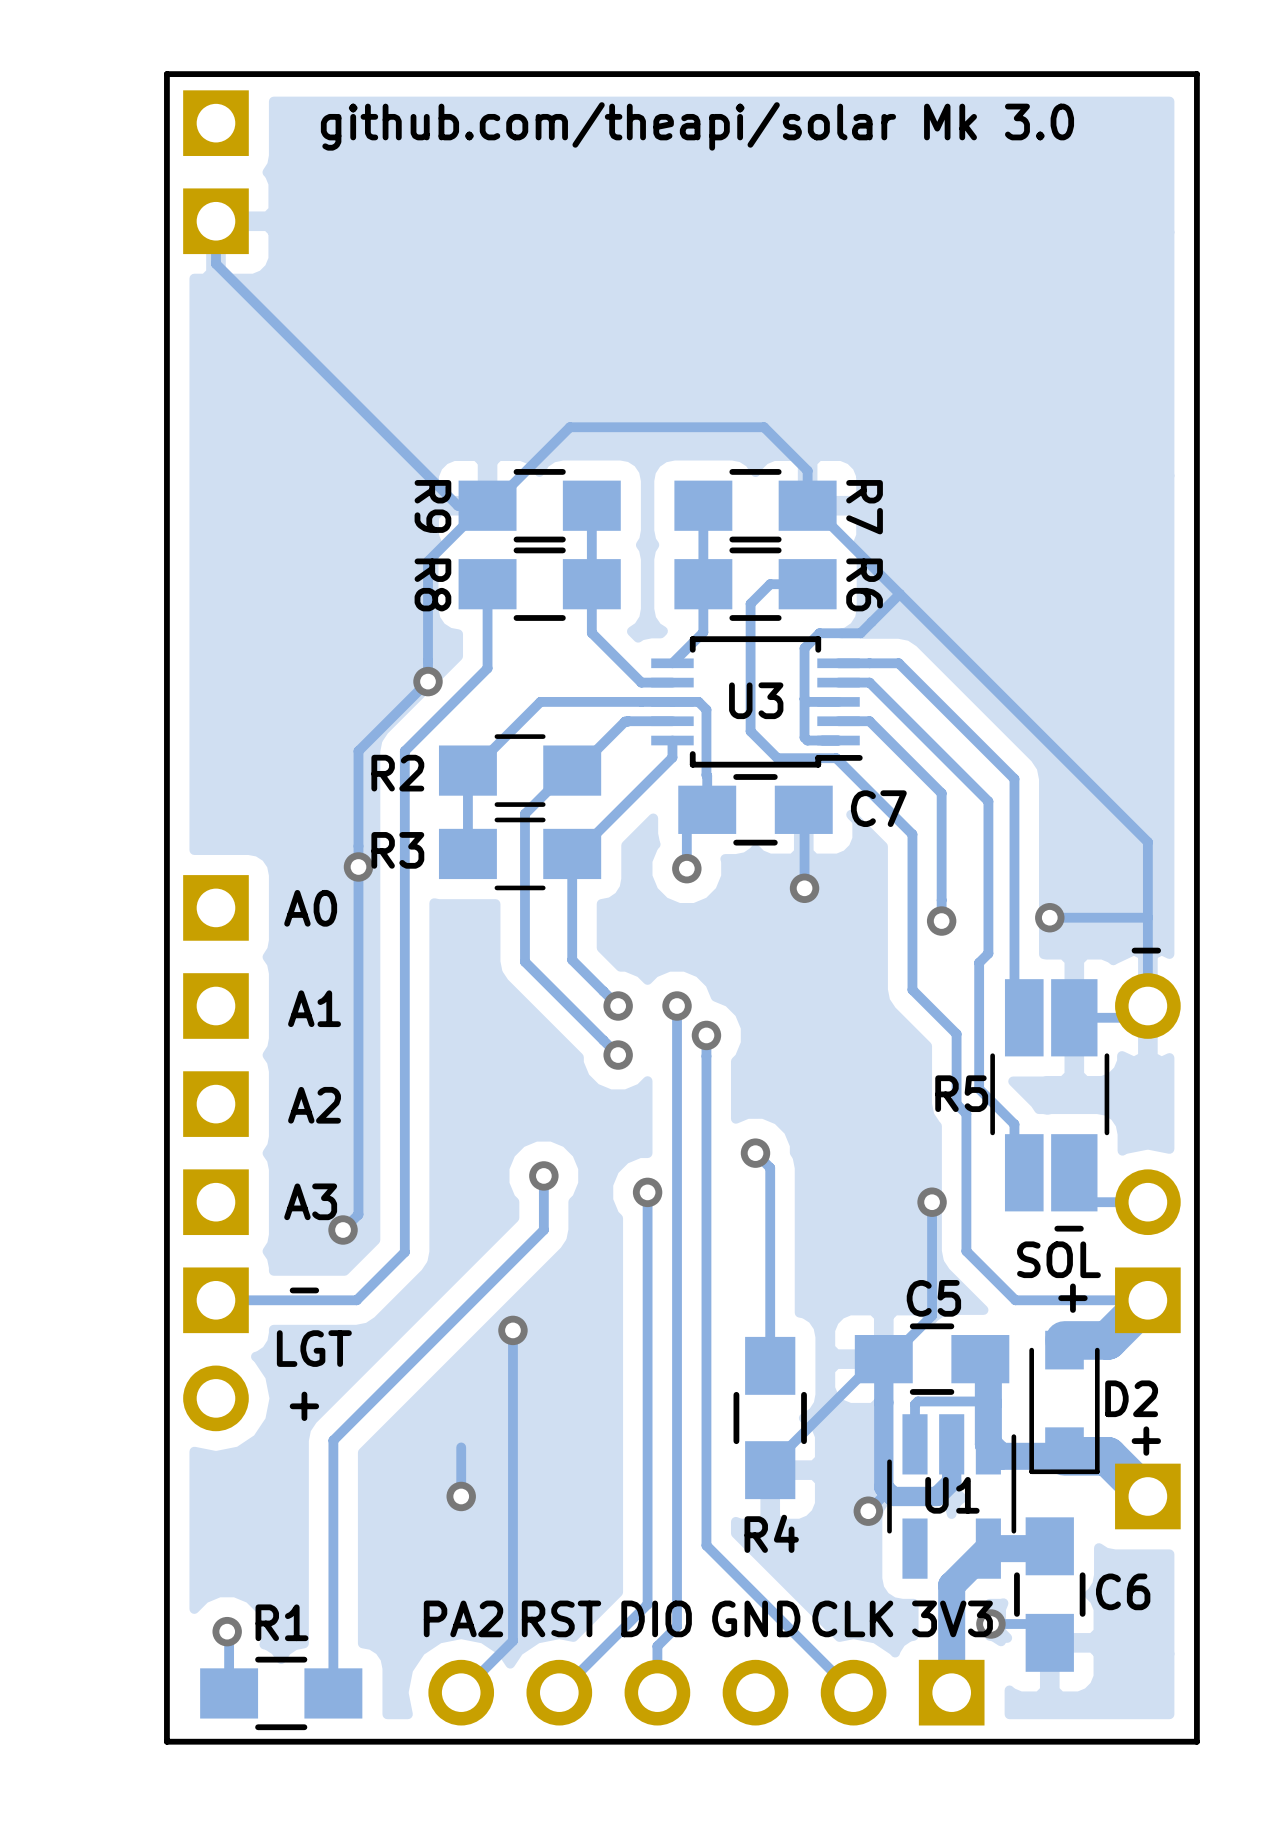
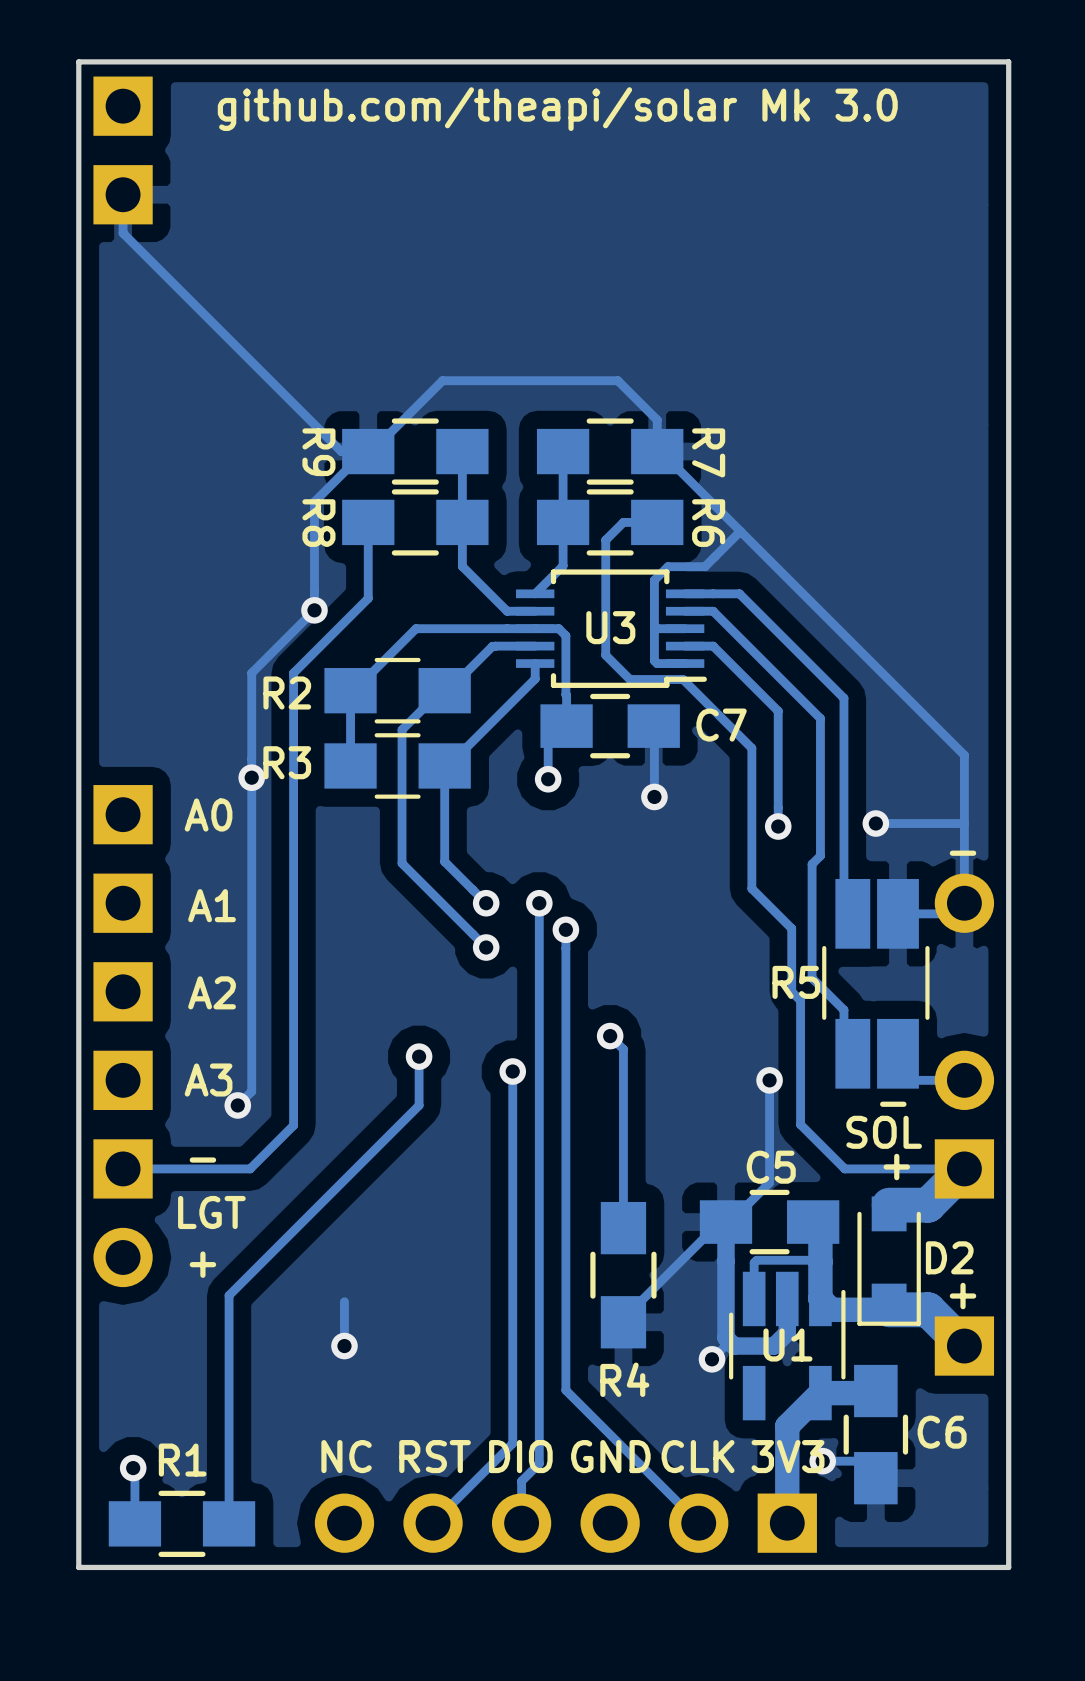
track: (512, 1330) (512, 1640) (461, 1692) -> none
via: (512, 1330) -> none
text: PA2 (463, 1618) -> NC (346, 1456)

